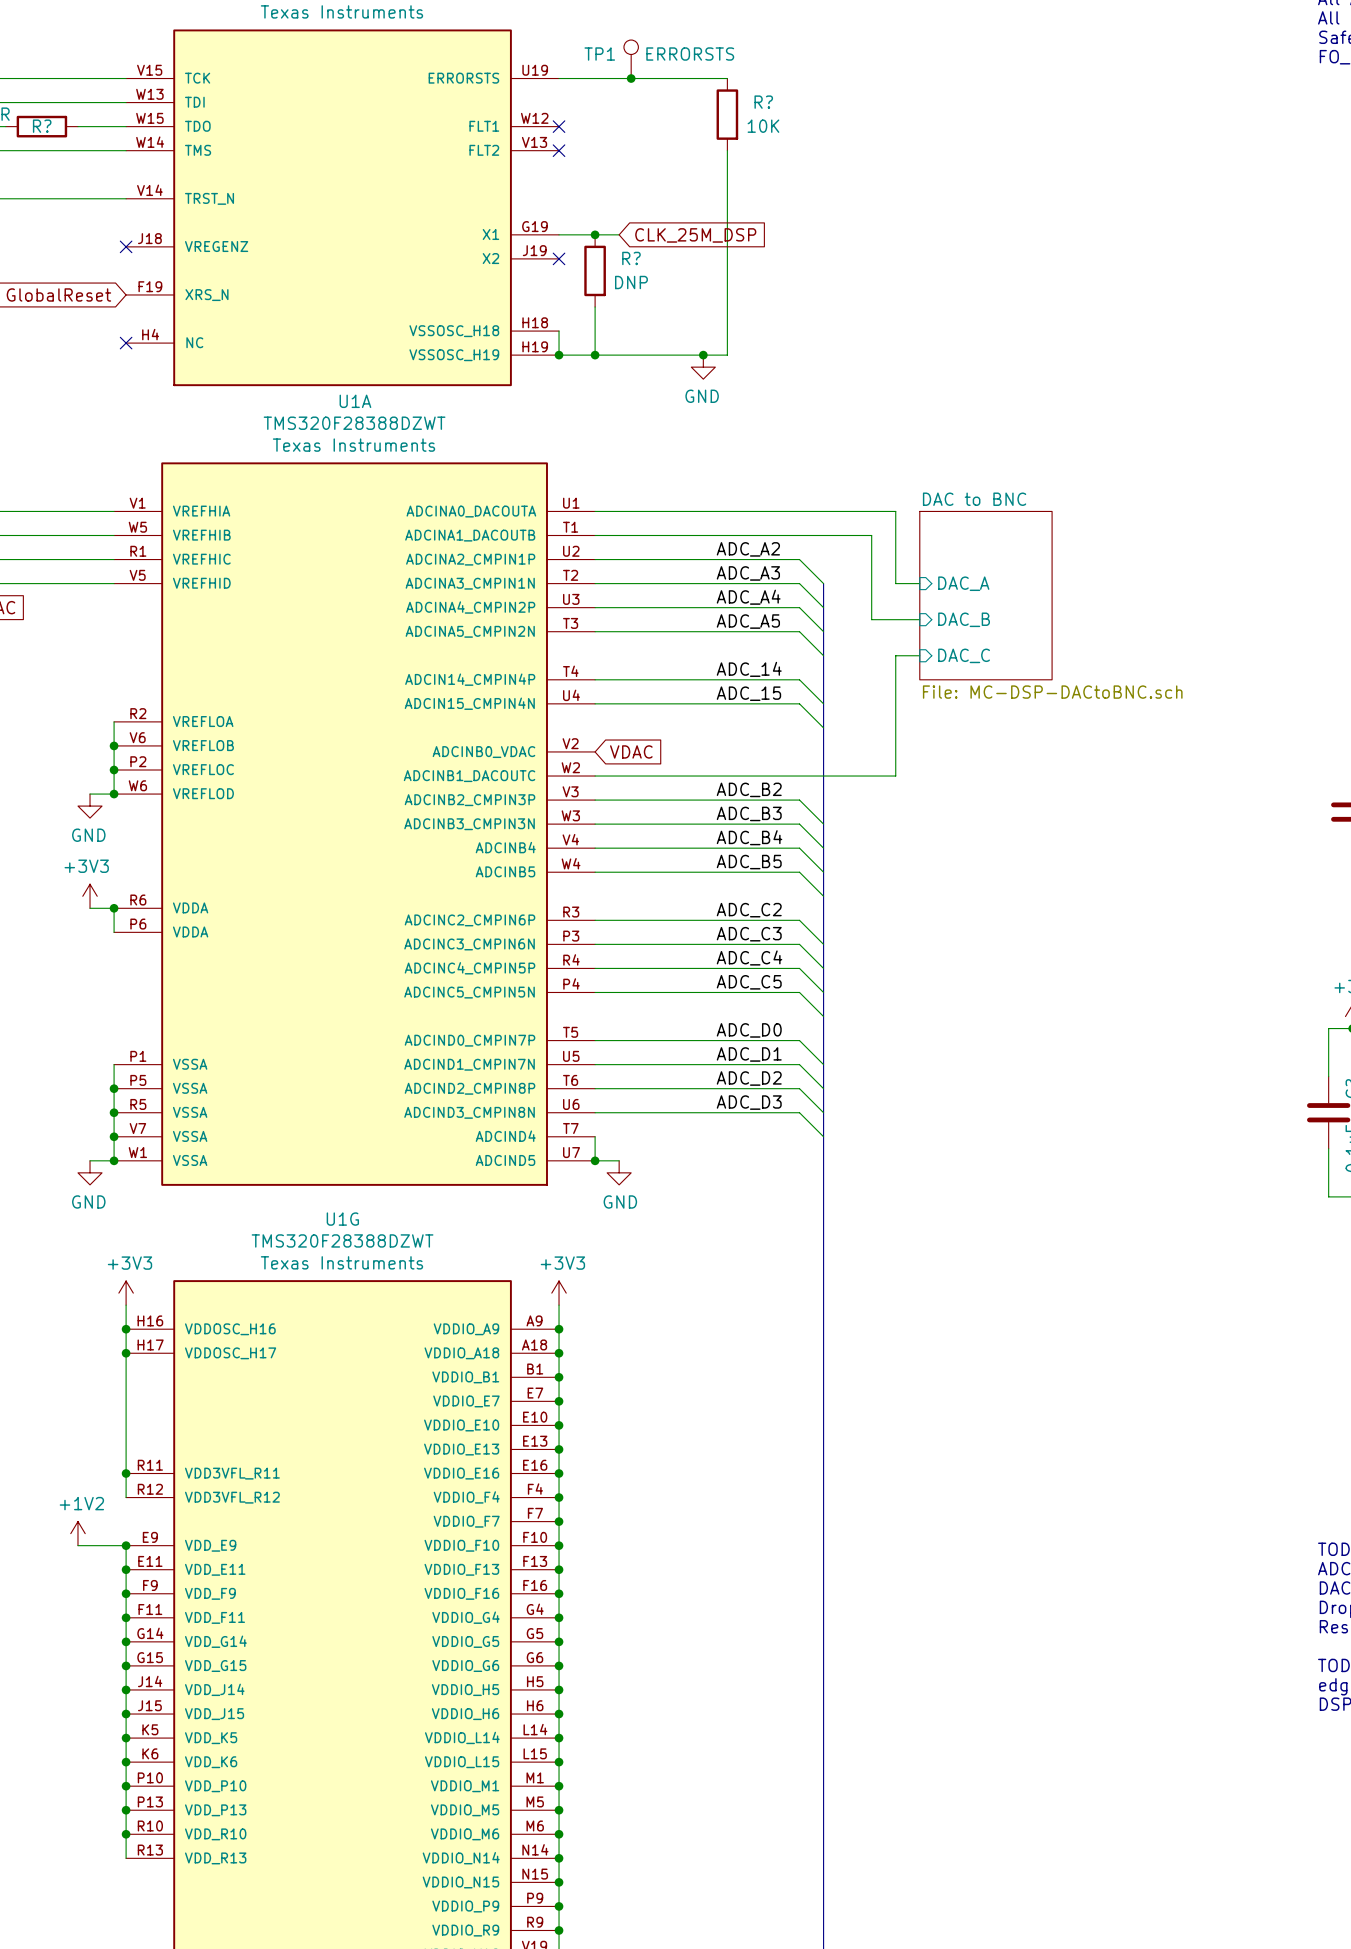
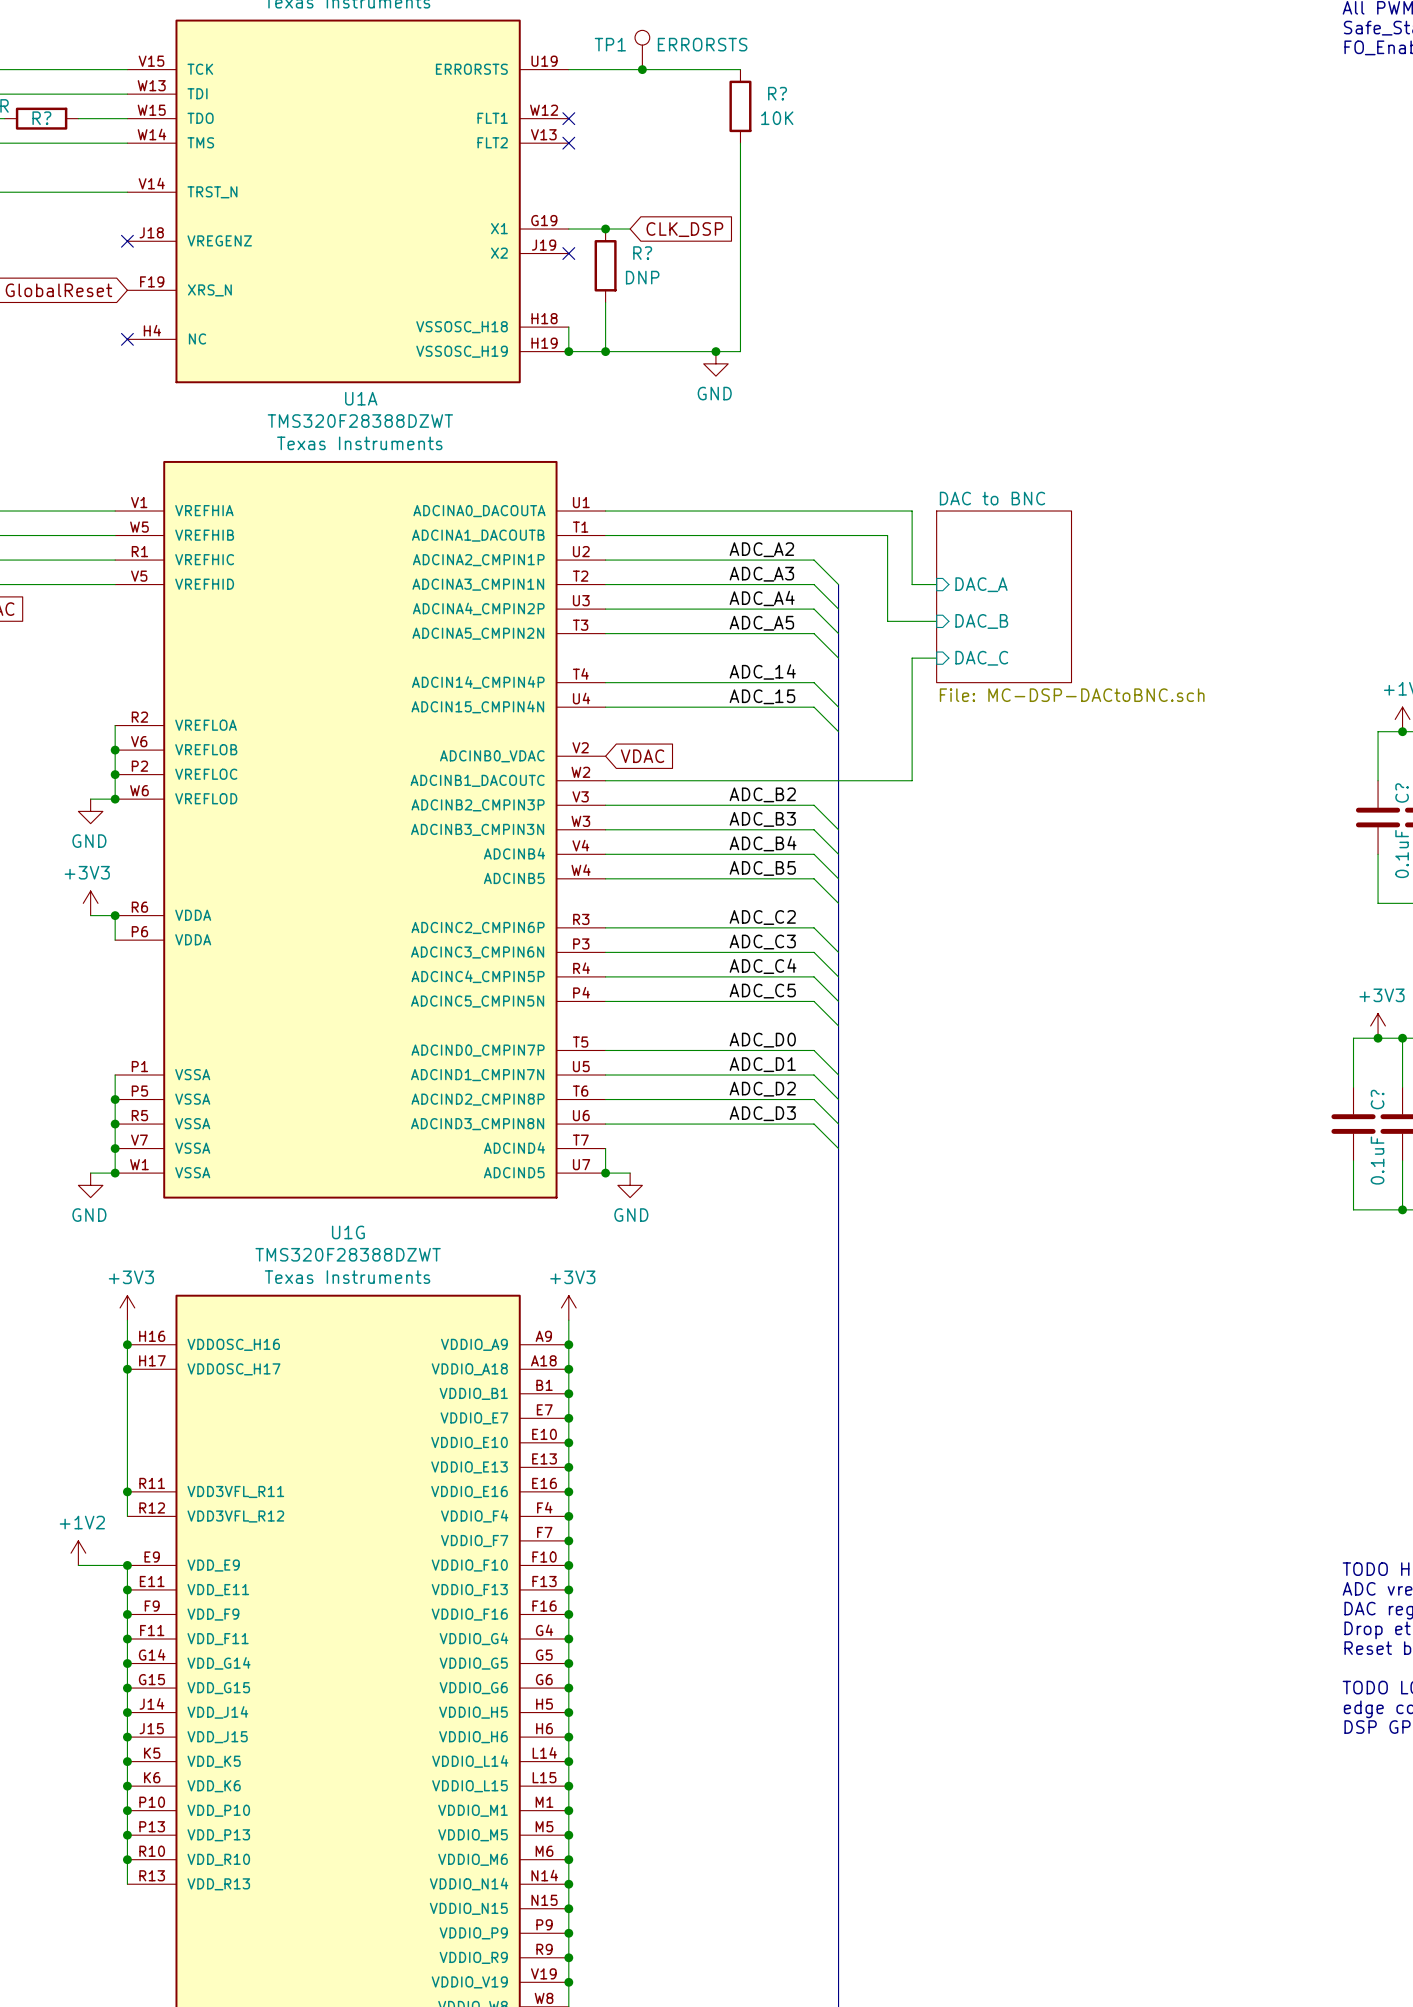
global label: CLK_25M_DSP (695, 235) -> CLK_DSP (684, 229)

